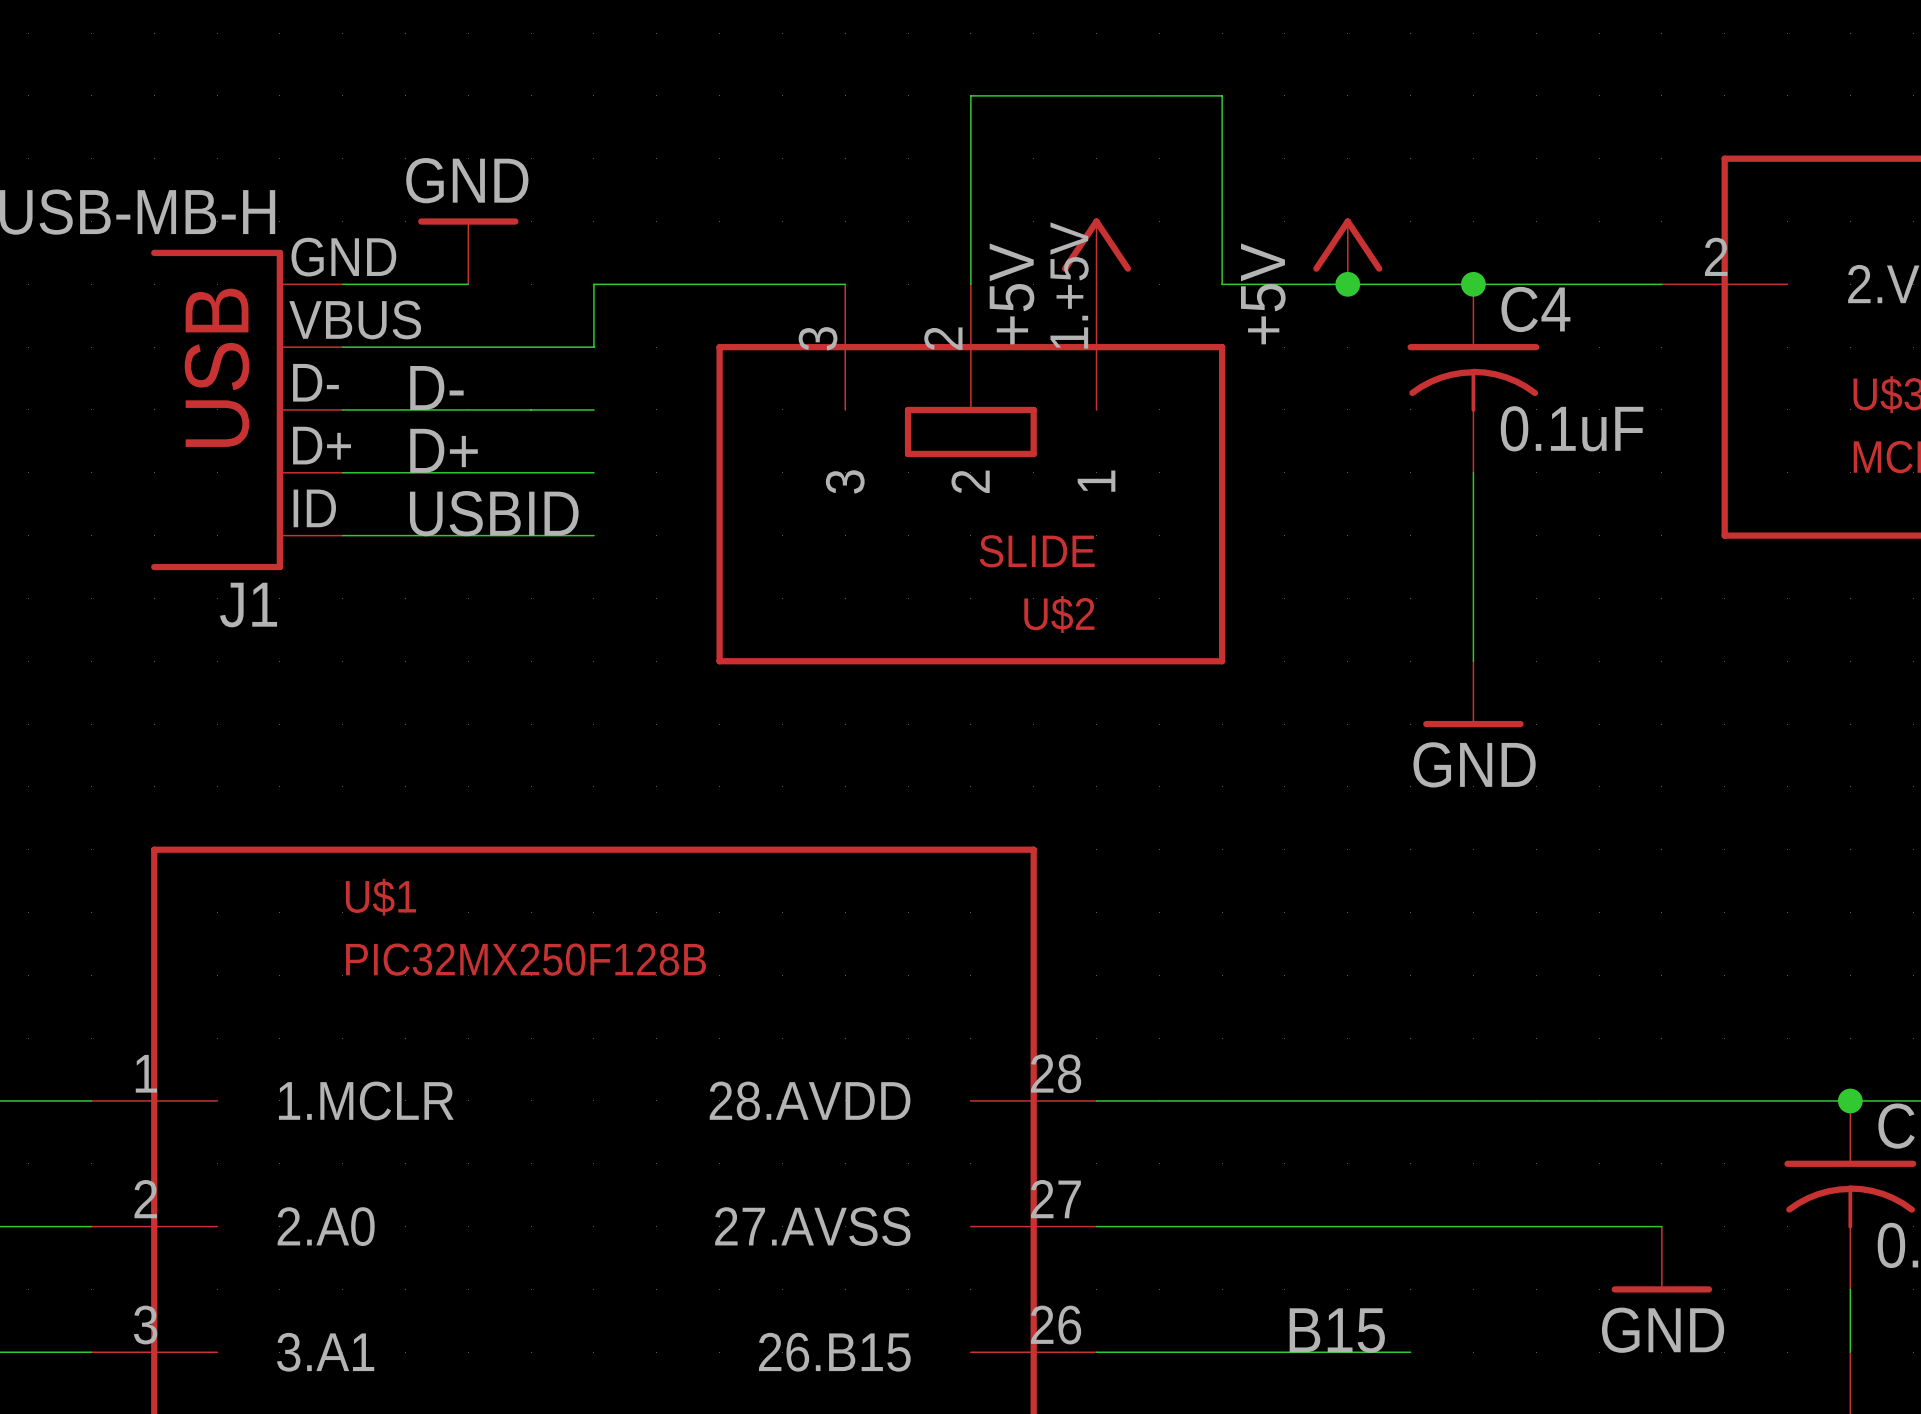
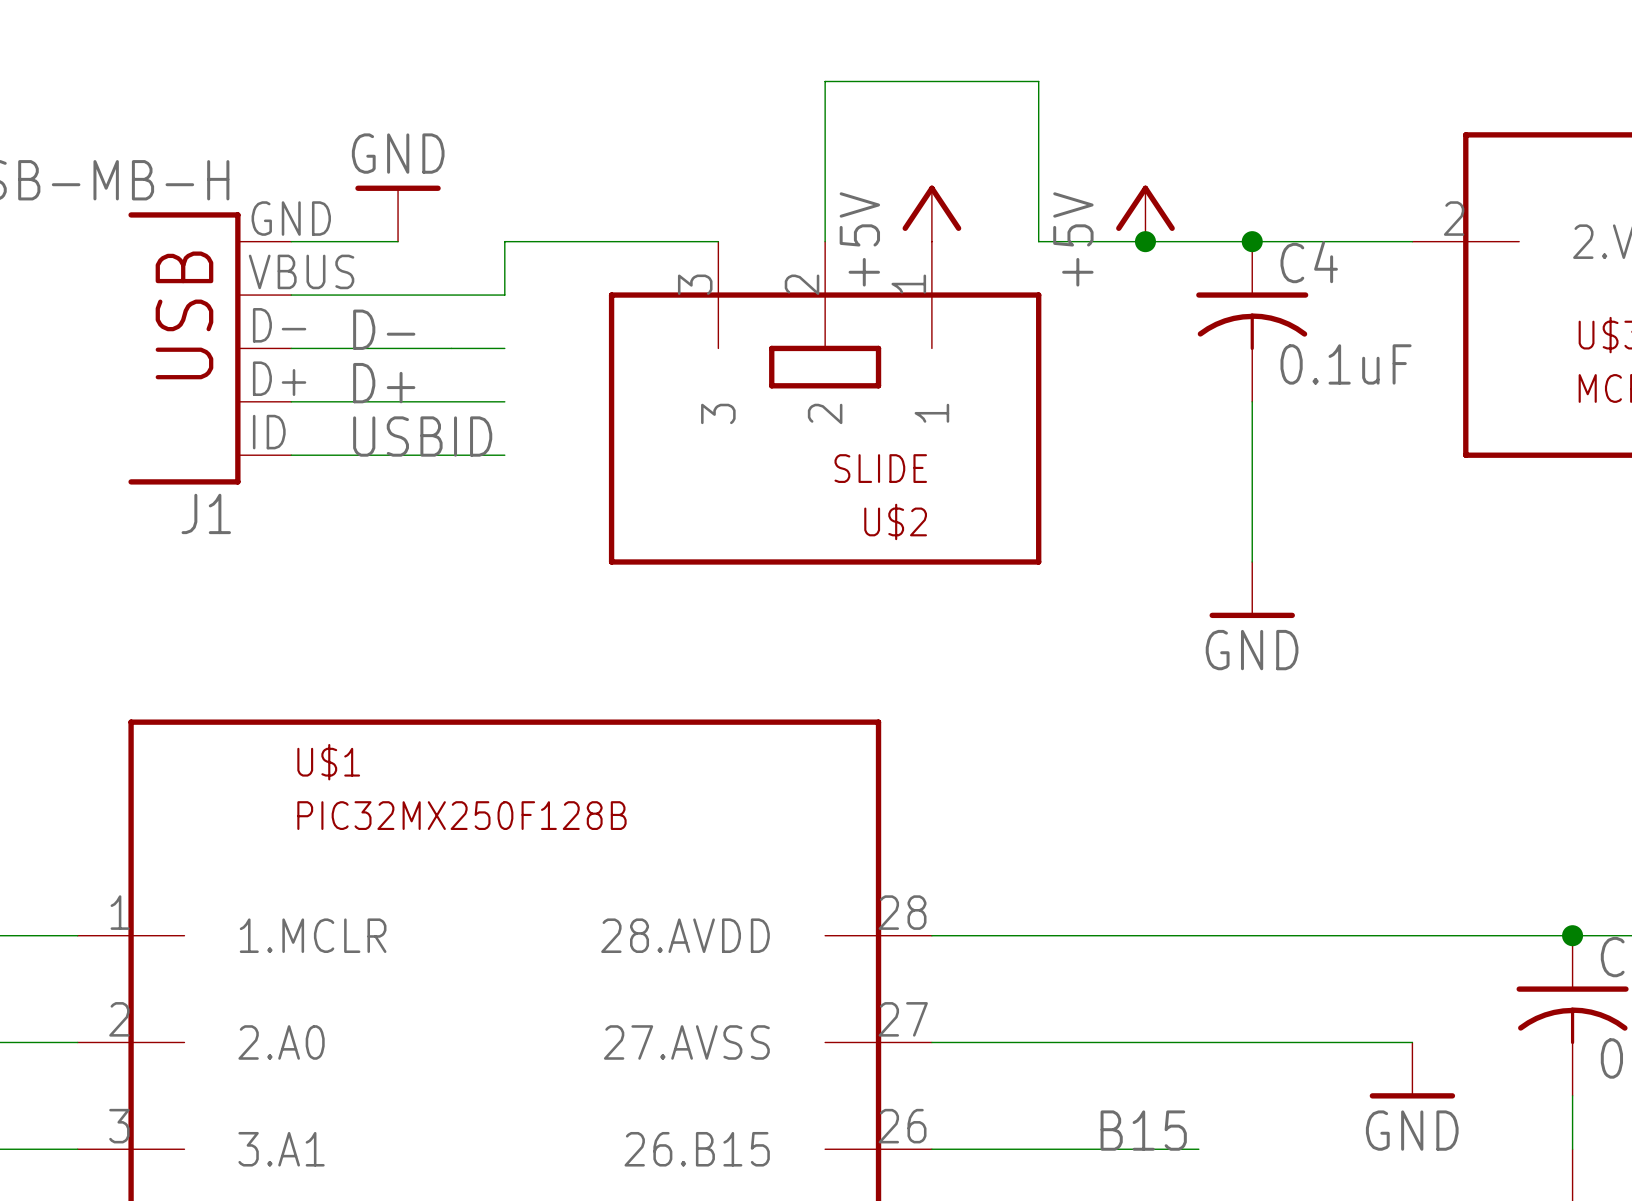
U$2 pin number: 1.+5V (1069, 285) -> 1 (908, 284)

